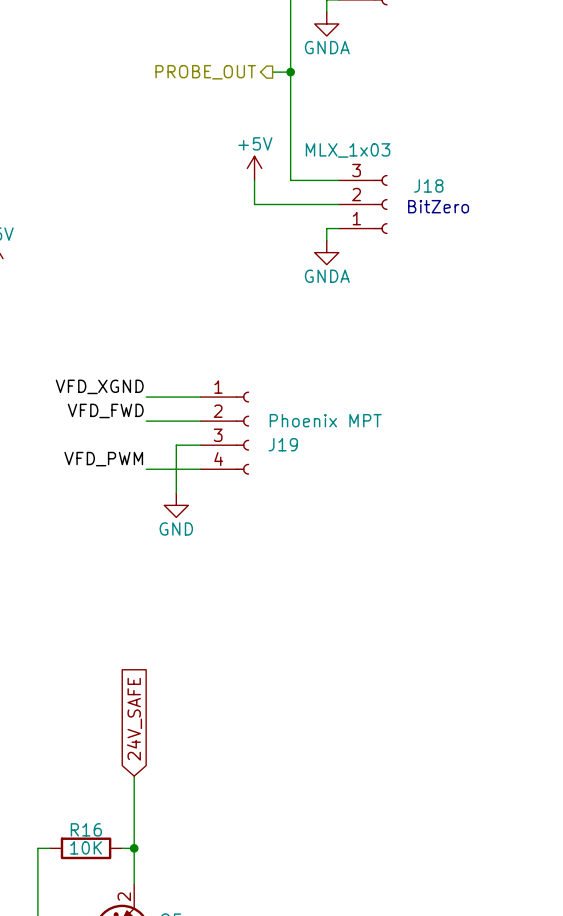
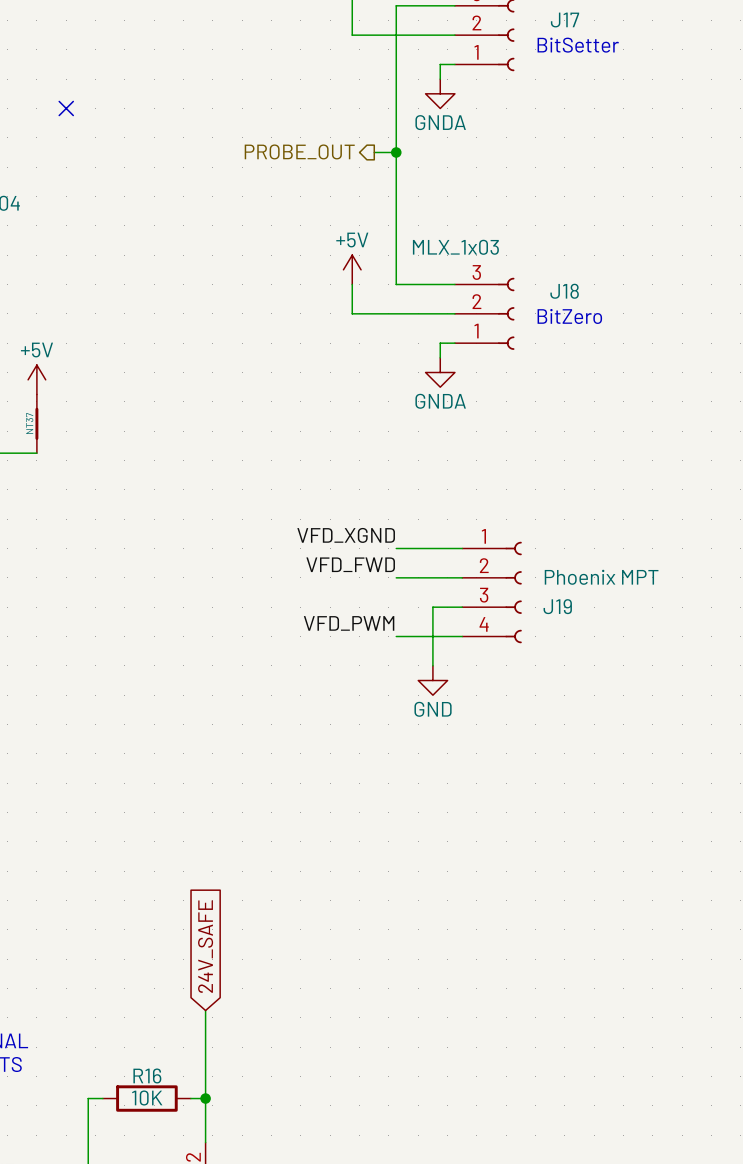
no-connect mark: none -> (66, 108)
label position: VFD_XGND (99, 386) -> VFD_XGND (346, 535)
wire: (146, 397) (200, 397) -> (396, 548) (462, 548)
label position: VFD_FWD (105, 410) -> VFD_FWD (350, 564)
wire: (146, 421) (200, 421) -> (396, 577) (462, 577)
J19 position: (224, 433) -> (492, 592)
wire: (200, 445) (176, 445) (176, 493) -> (462, 607) (432, 607) (432, 665)
label position: VFD_PWM (103, 459) -> VFD_PWM (349, 623)
wire: (146, 469) (200, 469) -> (396, 636) (462, 636)
power symbol position: GND (176, 505) -> GND (432, 680)

